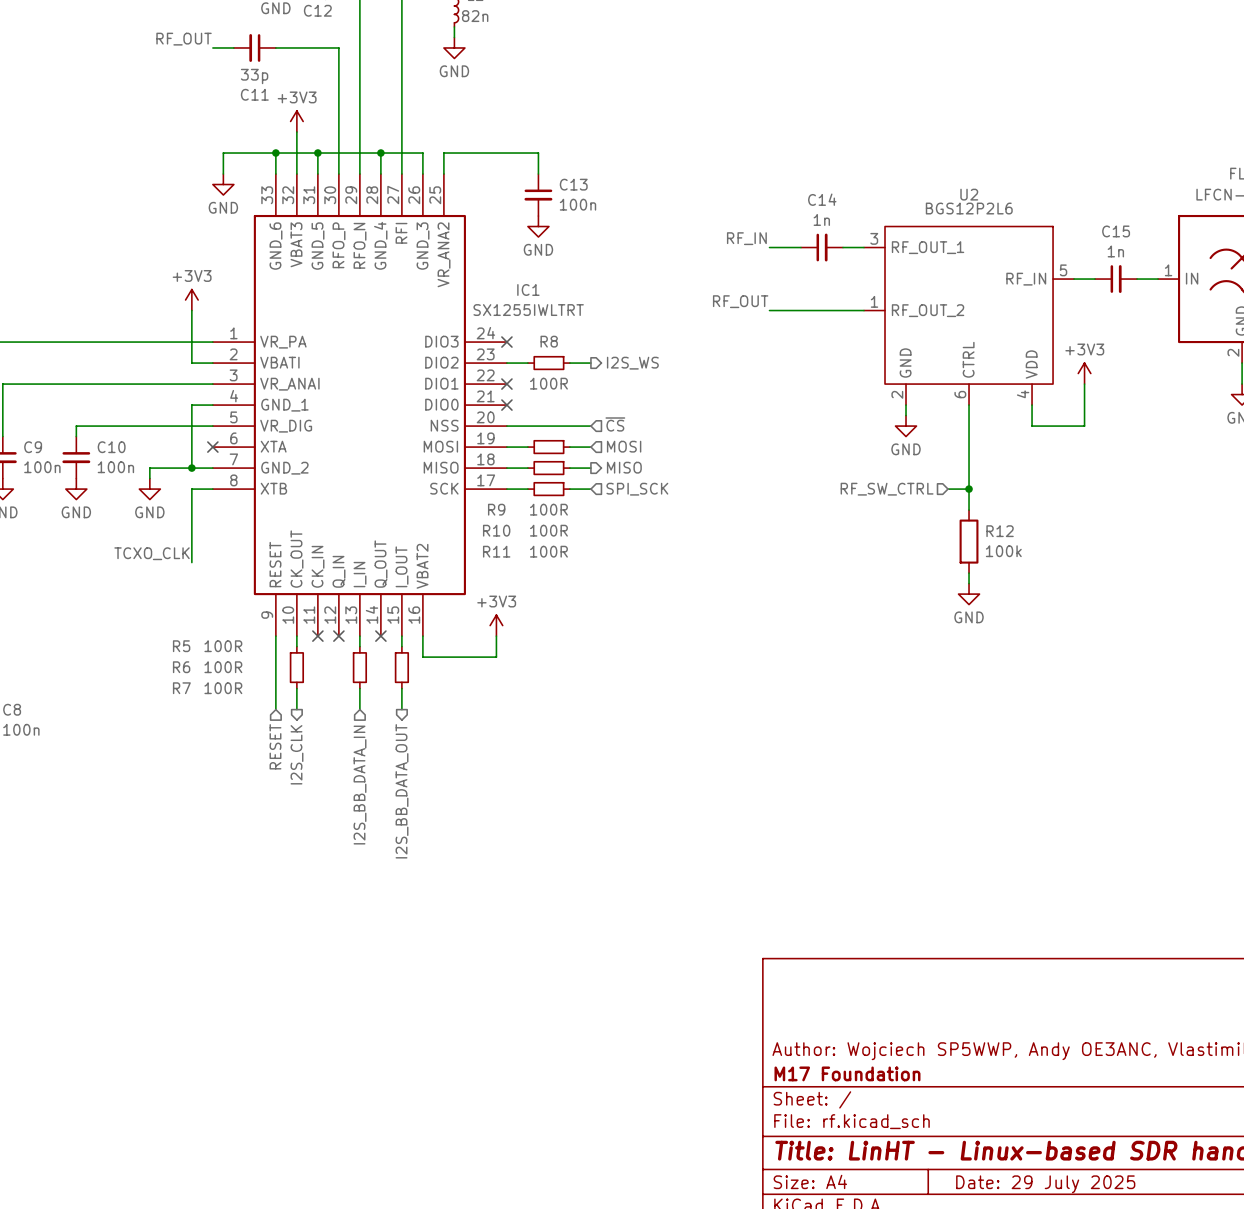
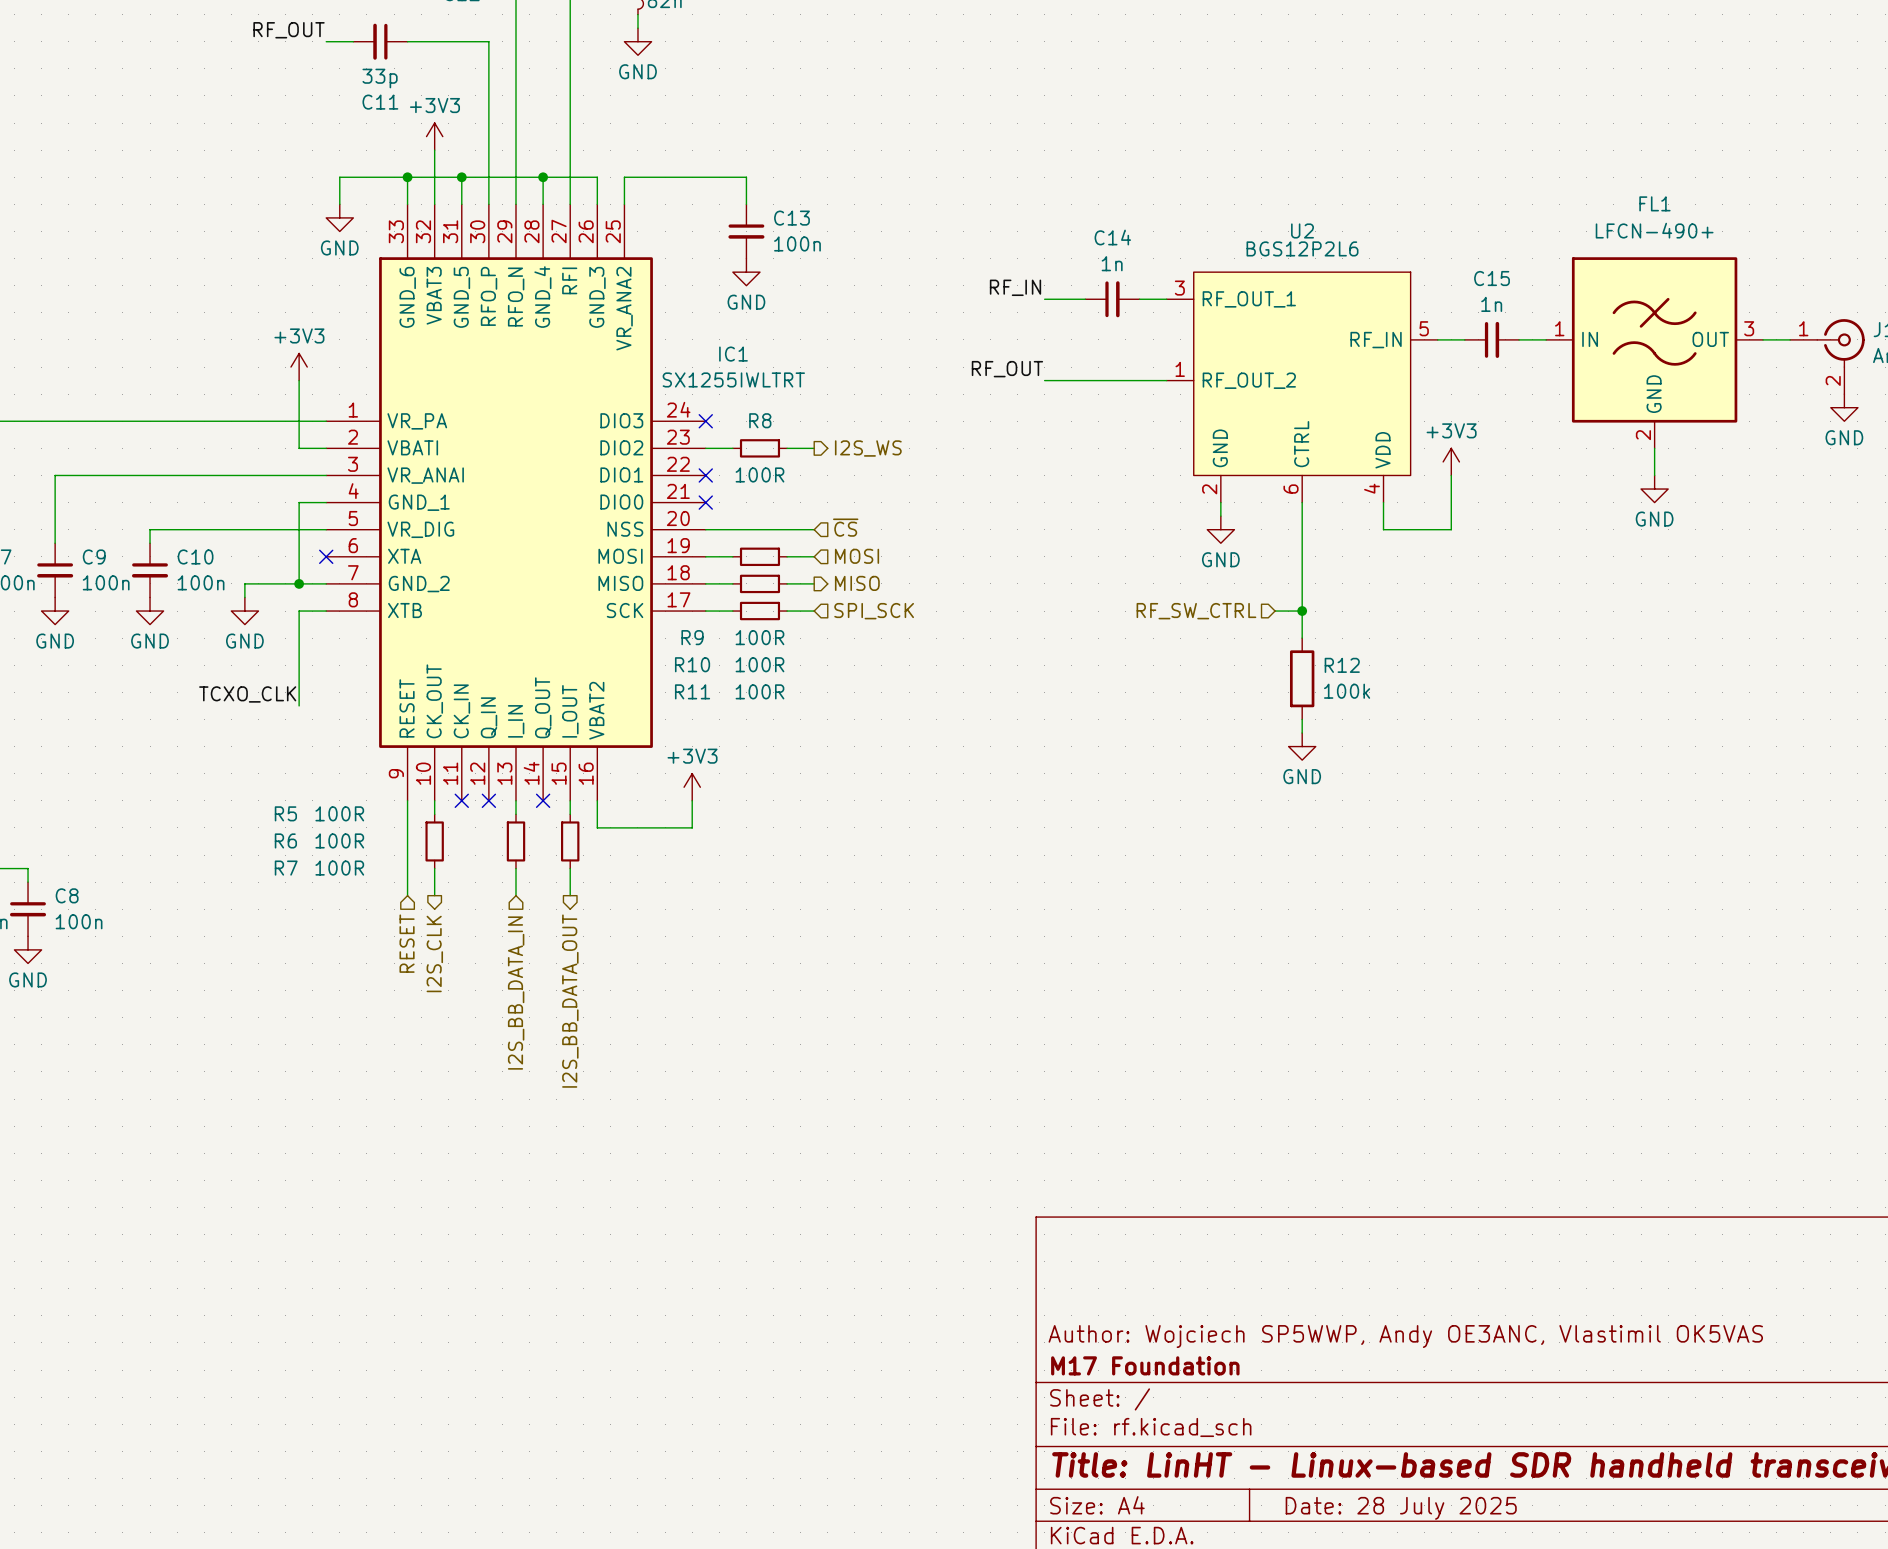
title block: Date: 29 July 2025 (1045, 1184) -> Date: 28 July 2025 (1401, 1508)

